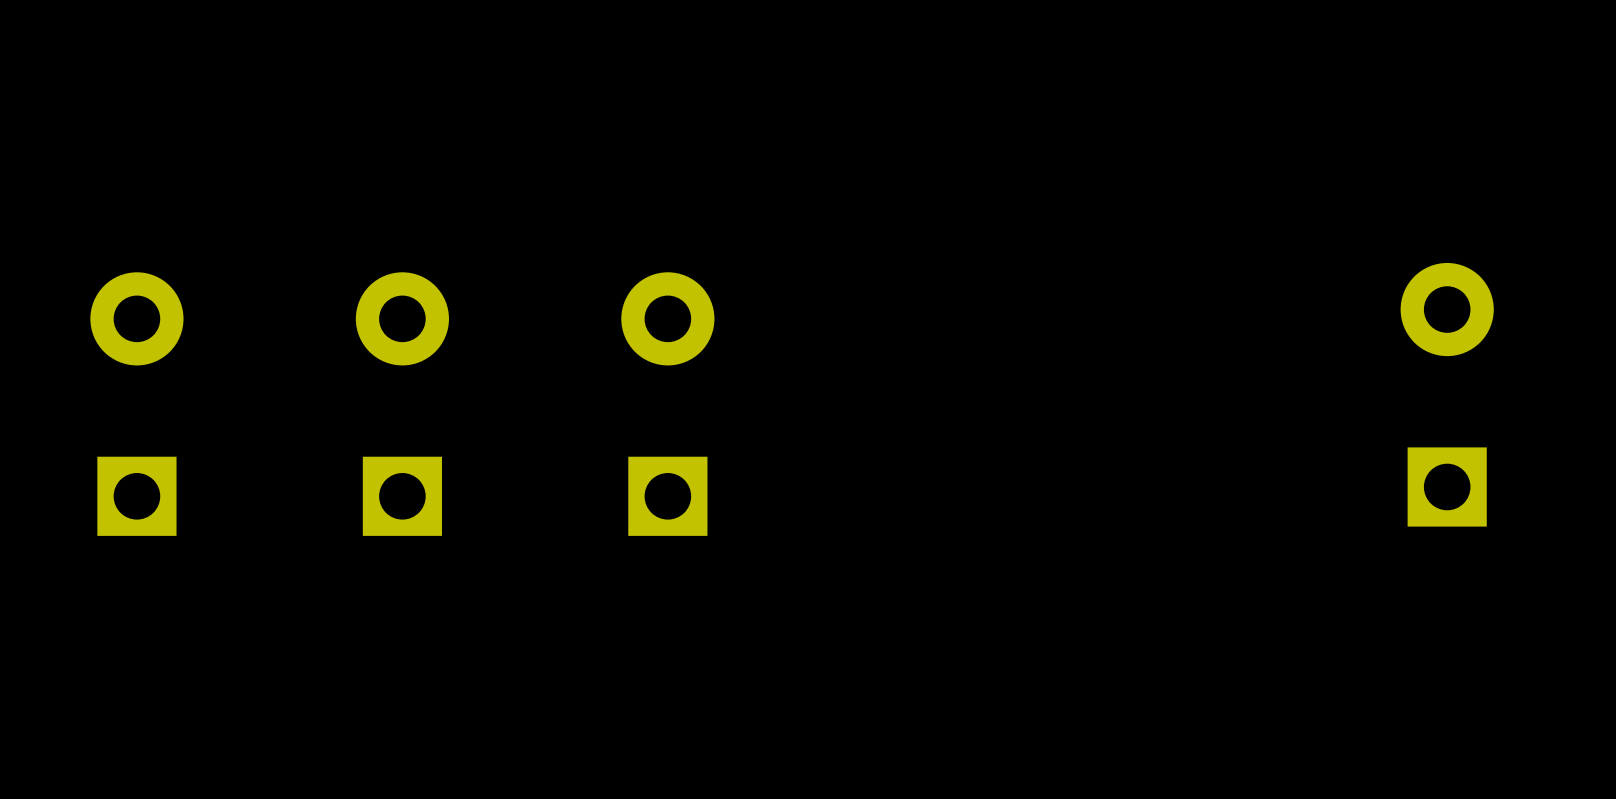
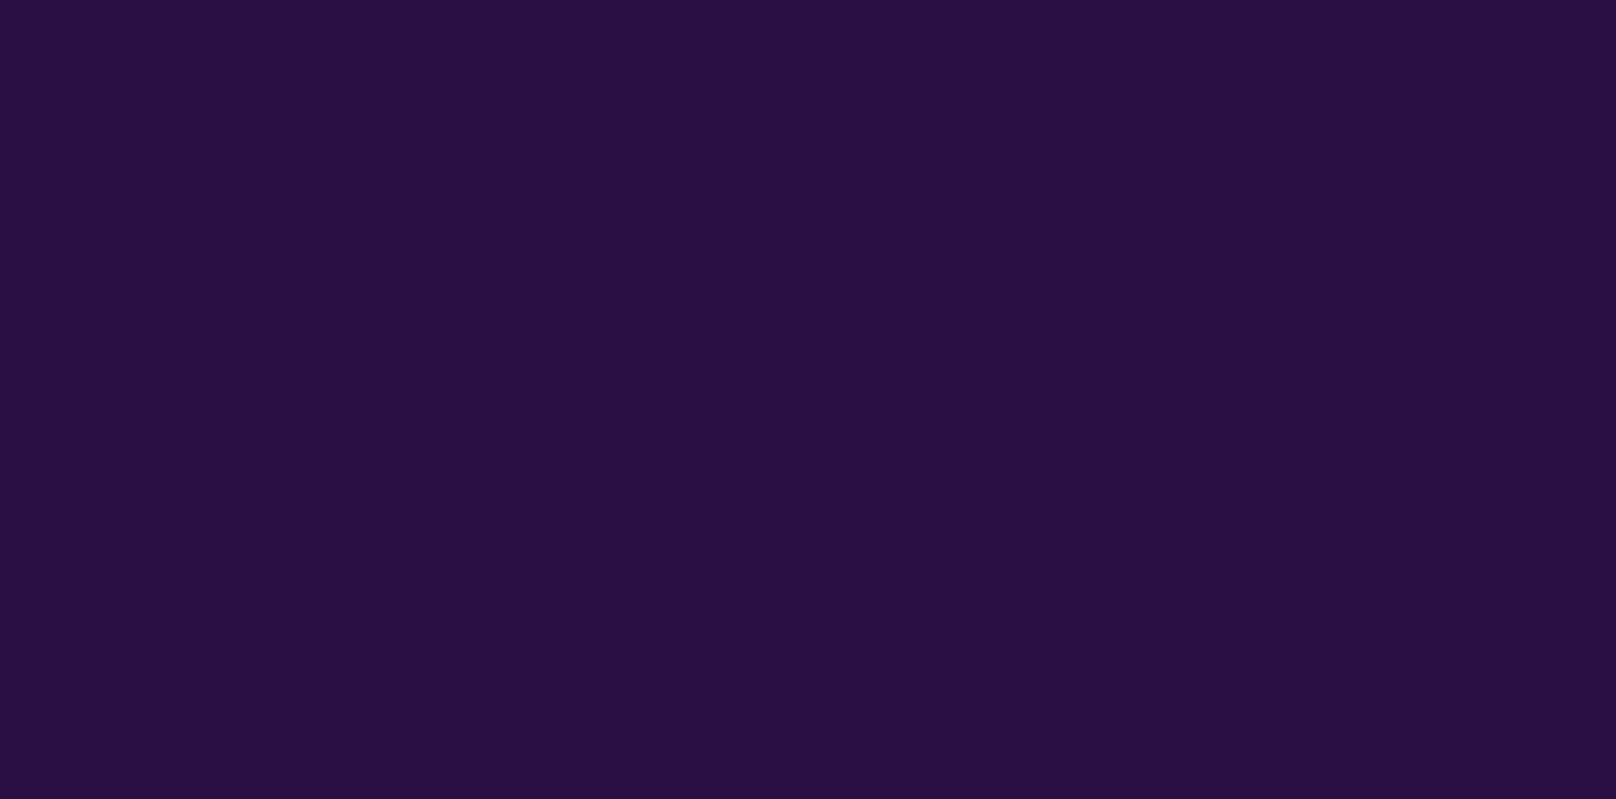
part: (1447, 394) -> none
part: (136, 404) -> none
part: (402, 404) -> none
part: (667, 404) -> none

